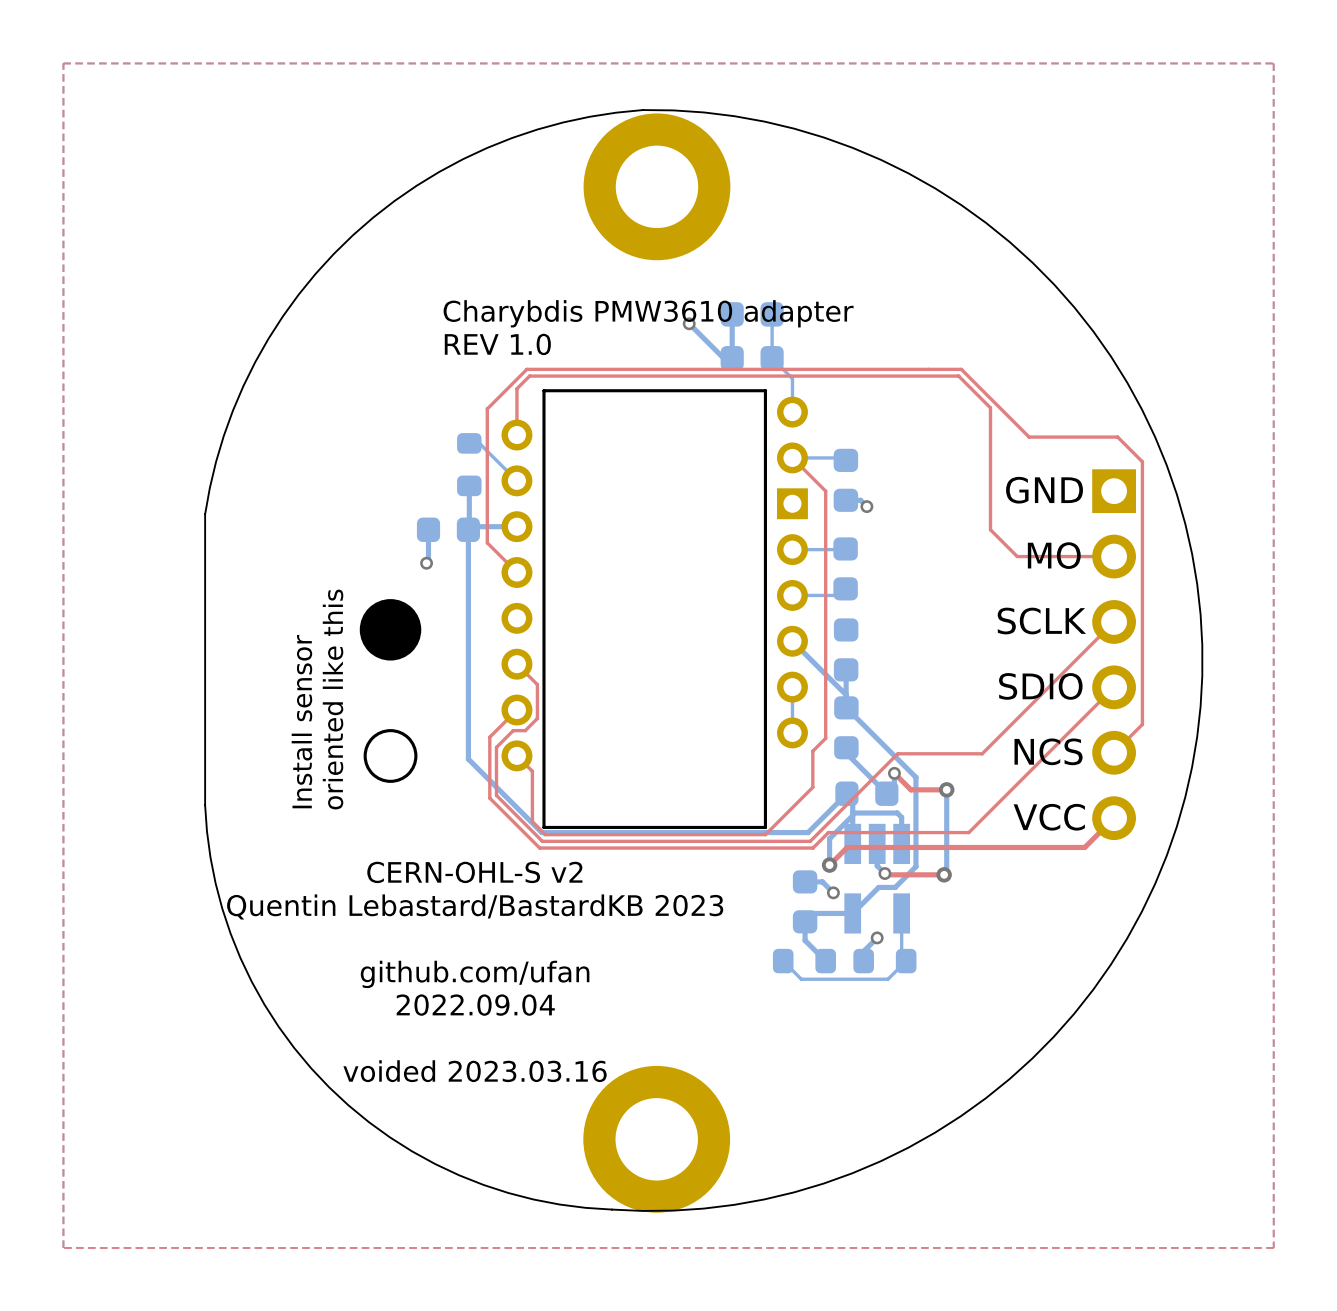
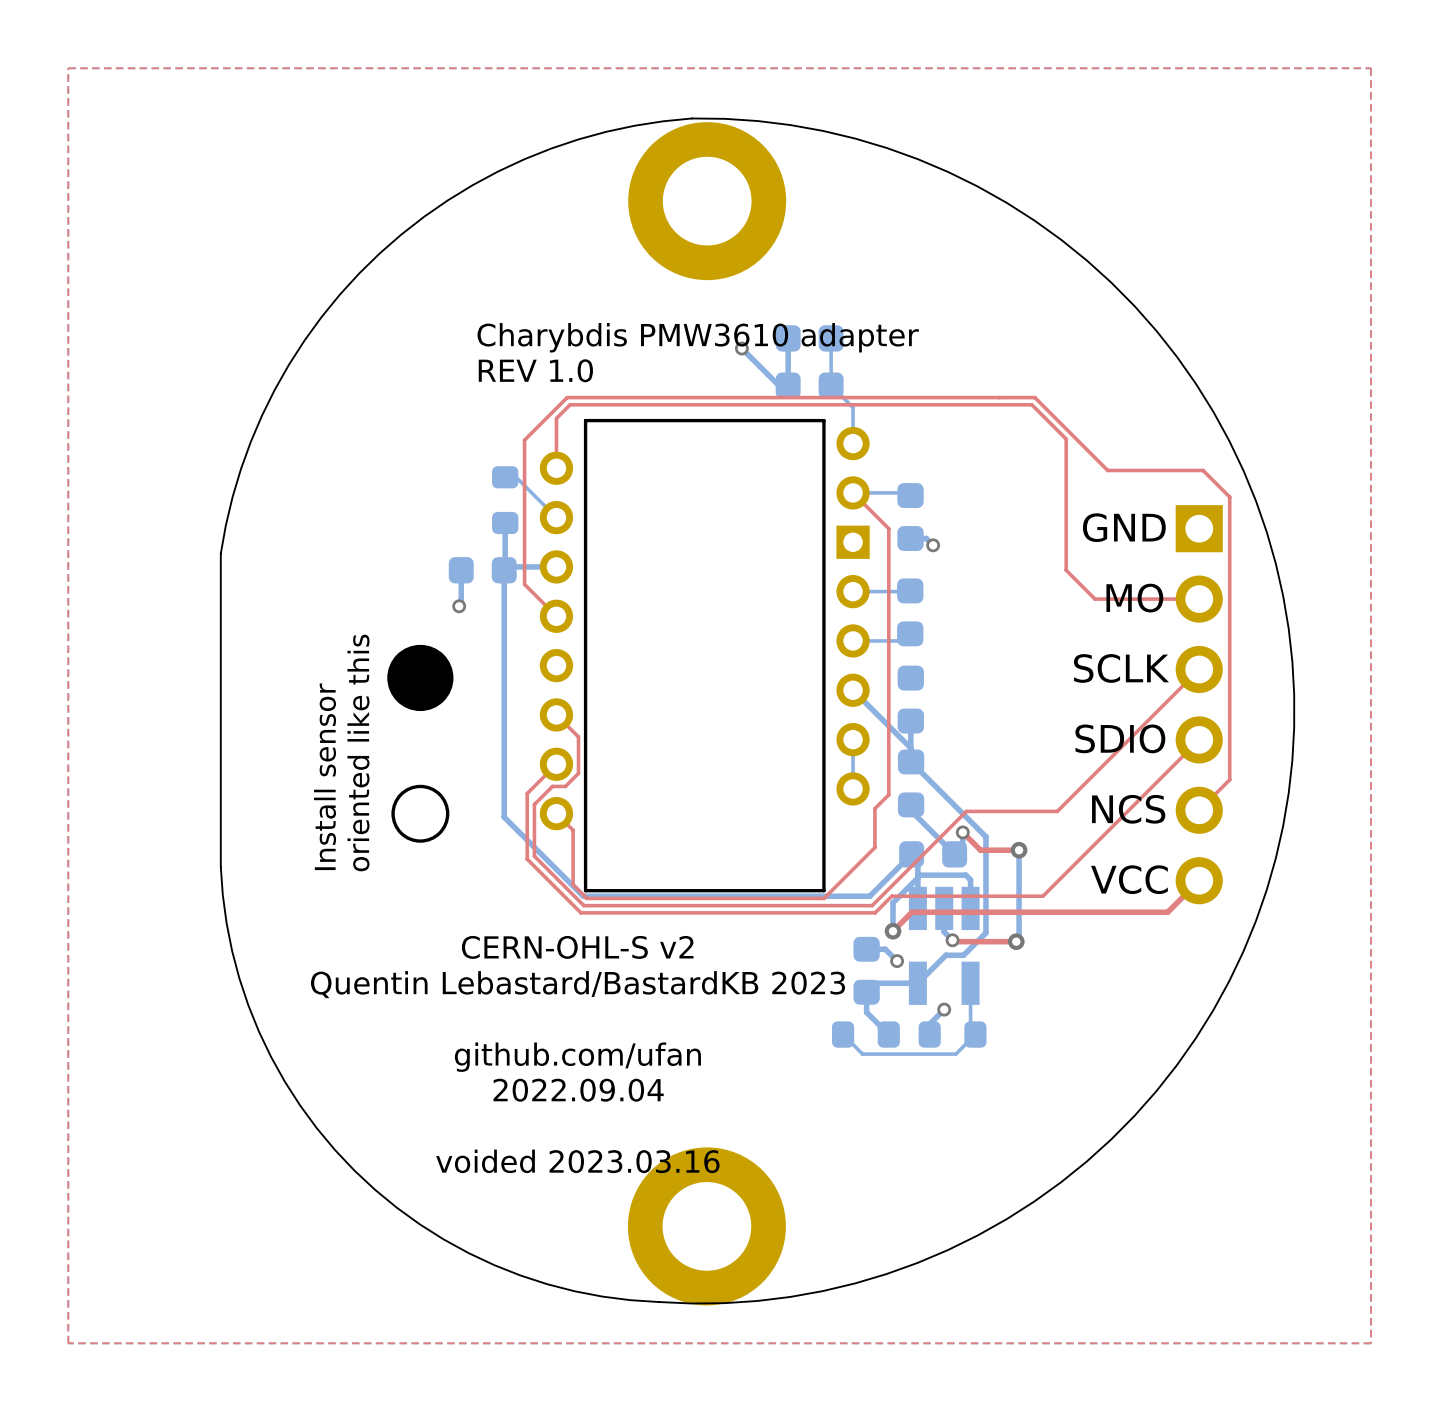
text position: CERN-OHL-S v2 (474, 872) -> CERN-OHL-S v2 (577, 947)
text position: Quentin Lebastard/BastardKB 2023 (475, 906) -> Quentin Lebastard/BastardKB 2023 (577, 984)
text position: github.com/ufan (475, 974) -> github.com/ufan (577, 1057)
text position: 2022.09.04 (475, 1005) -> 2022.09.04 (578, 1090)
text position: voided 2023.03.16 (475, 1071) -> voided 2023.03.16 (577, 1161)

